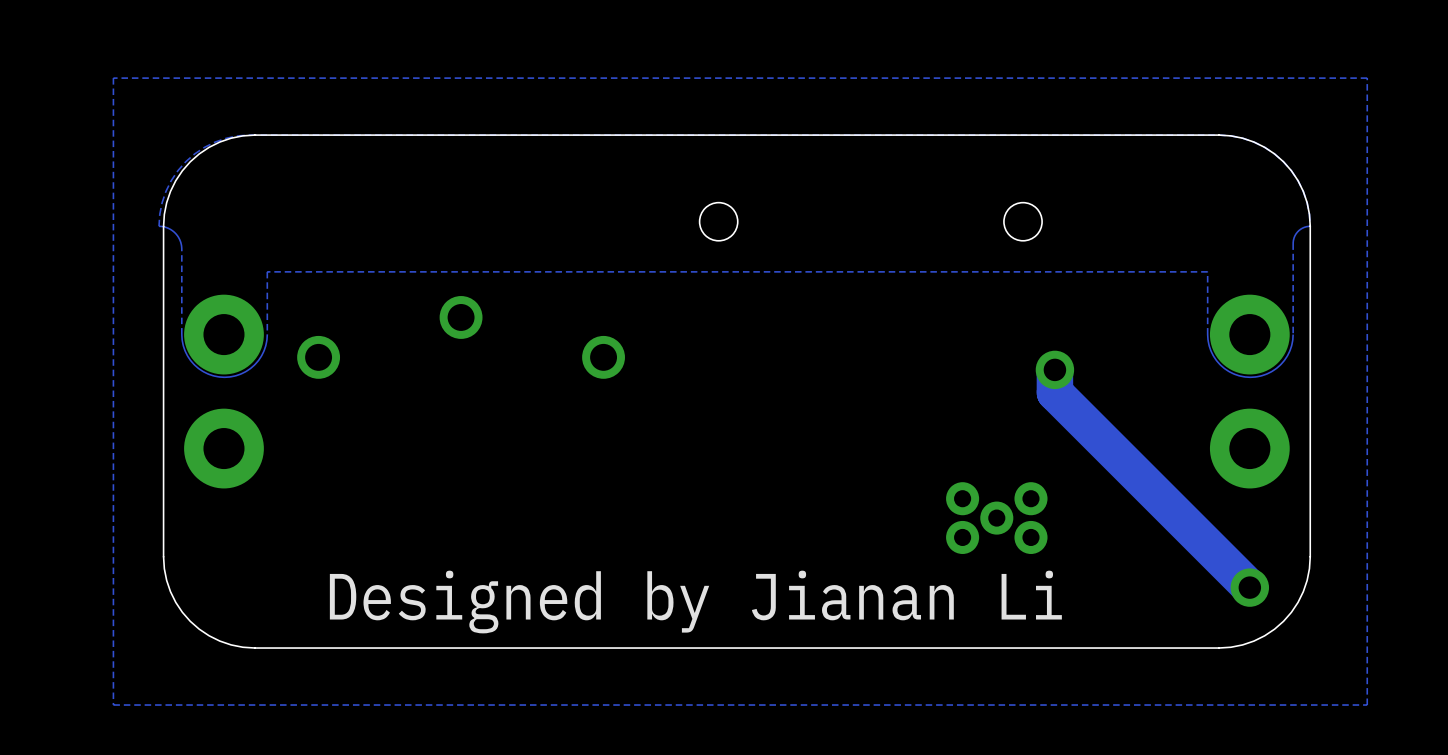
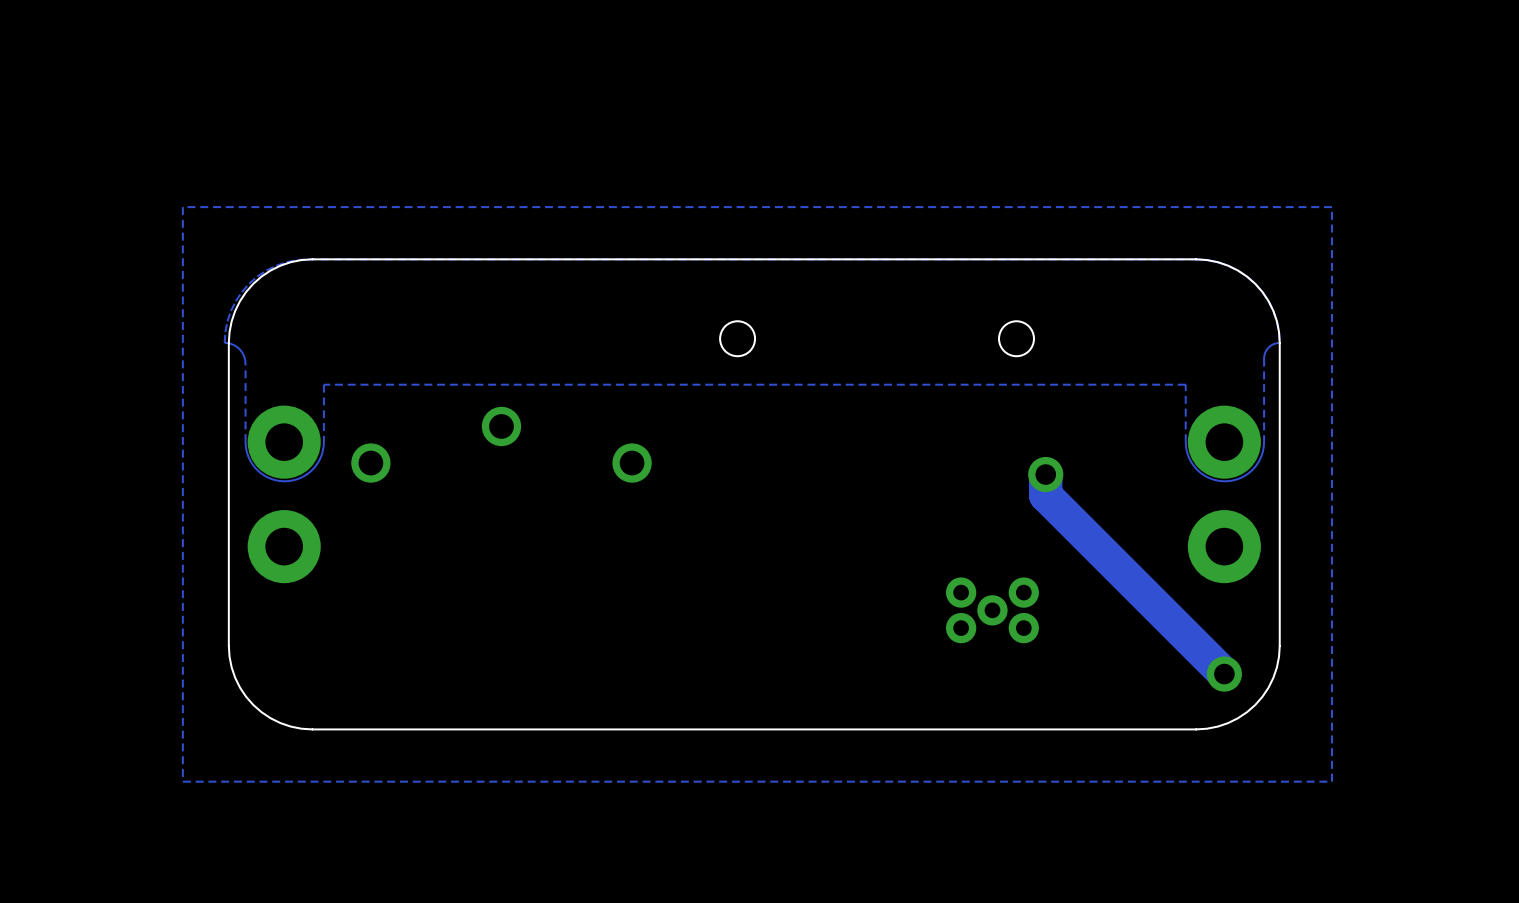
text: Designed by Jianan Li (695, 602) -> none

